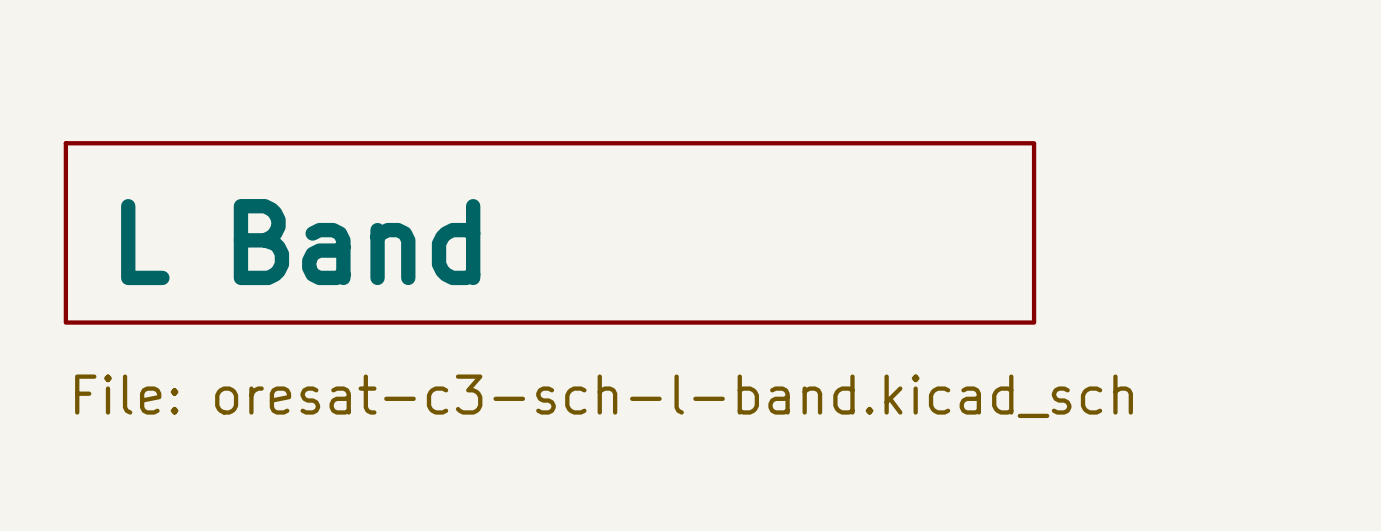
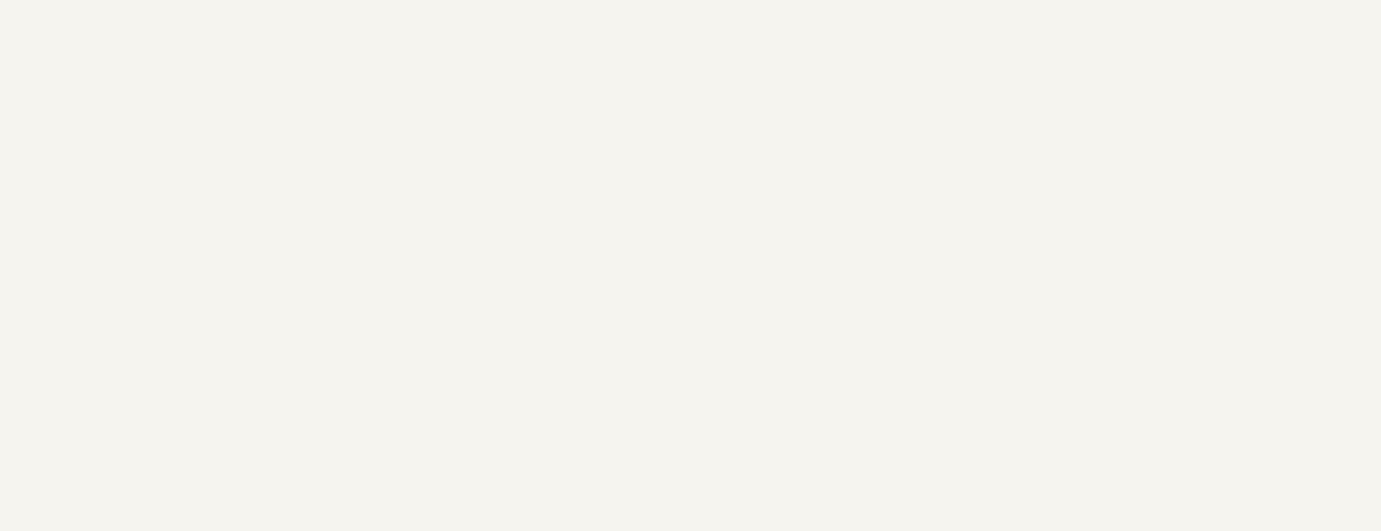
sheet L Band: File: oresat-c3-sch-l-band.kicad_sch (549, 232) -> none

